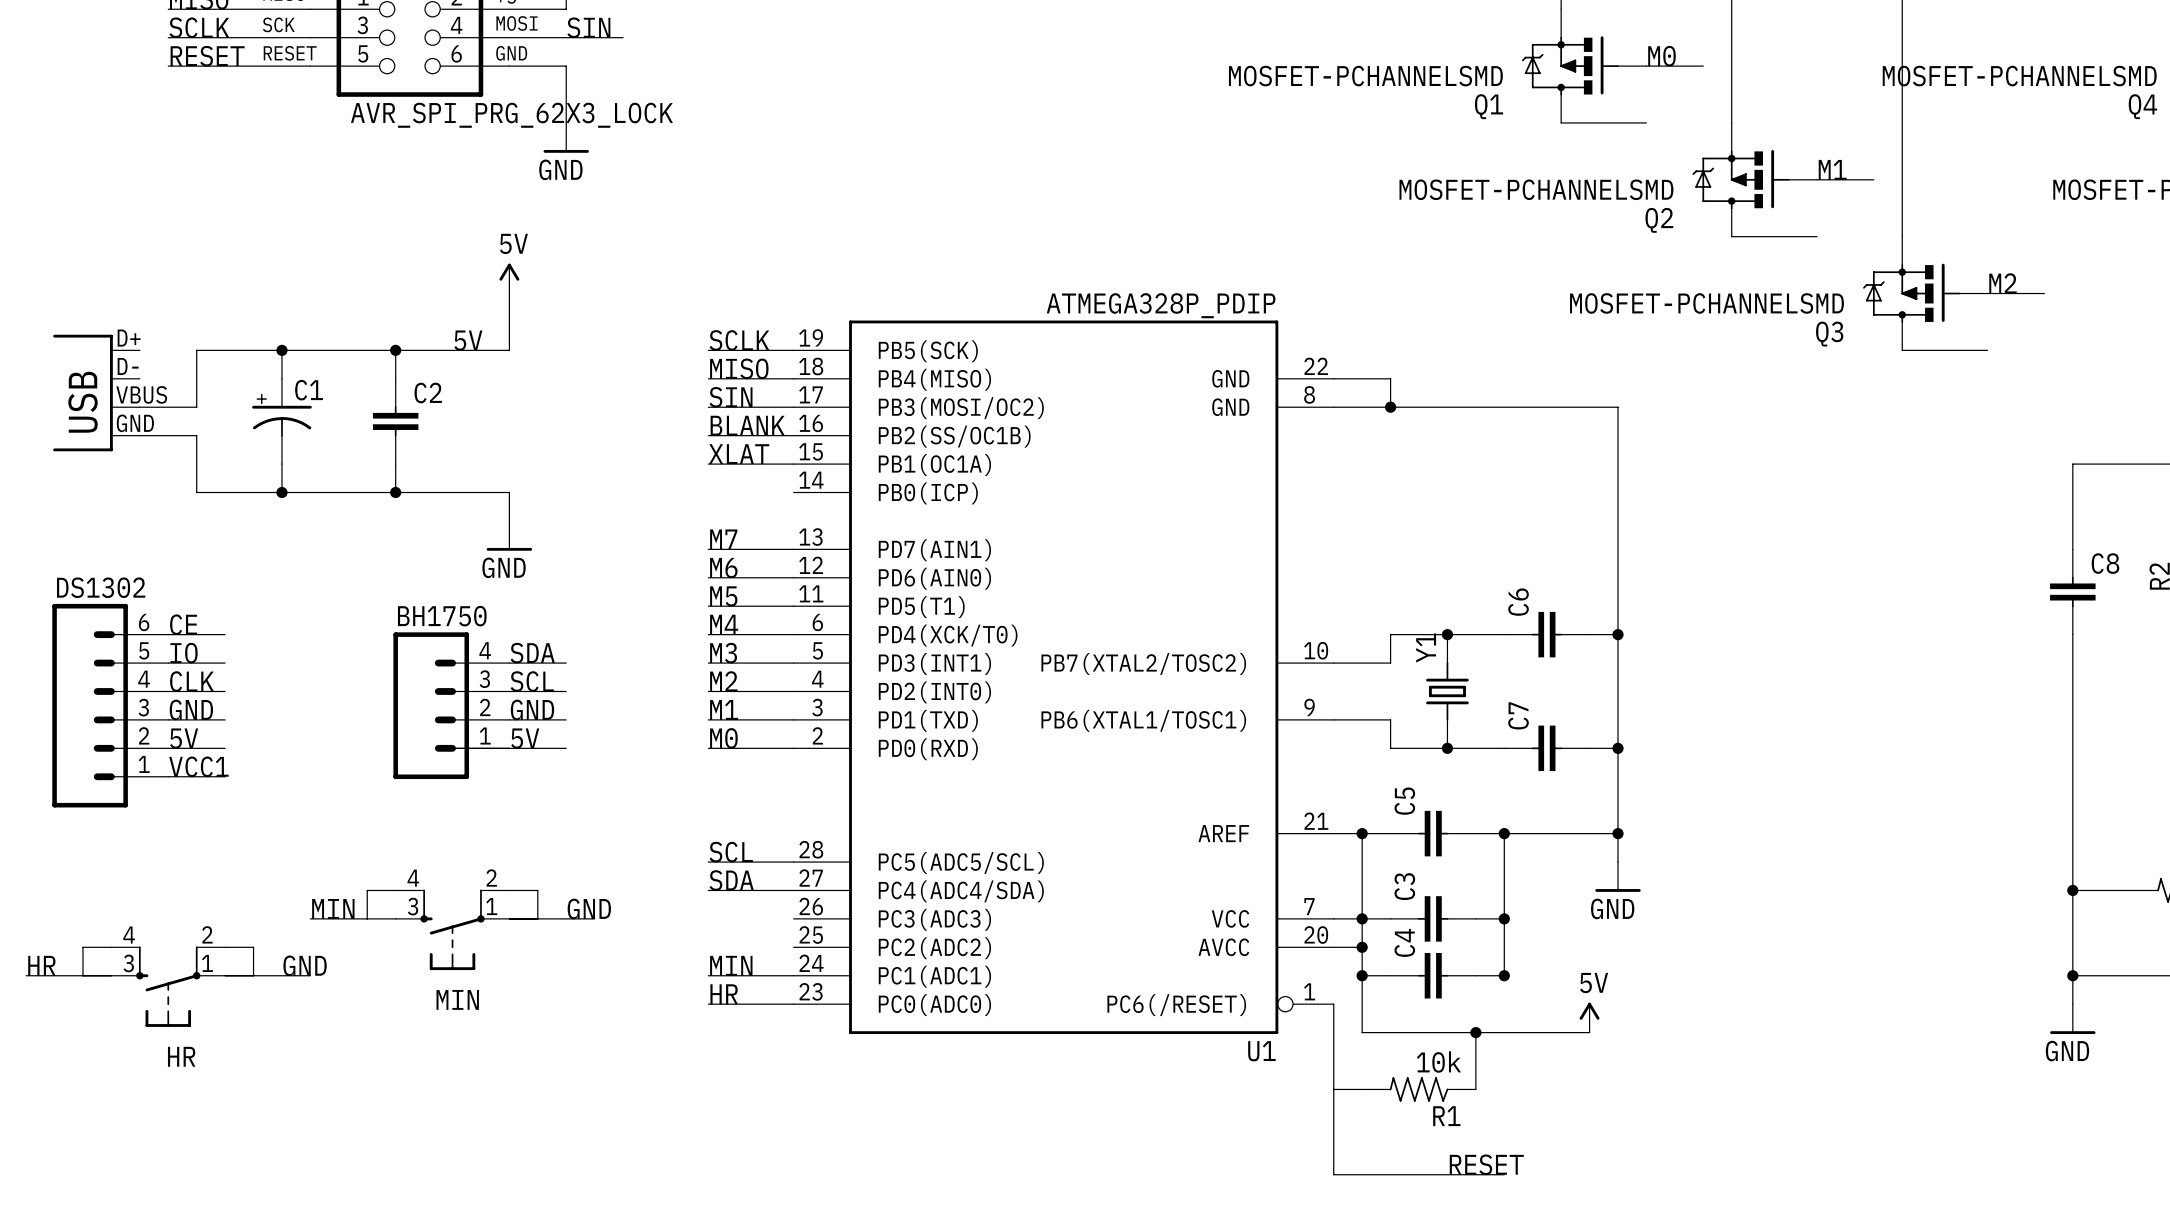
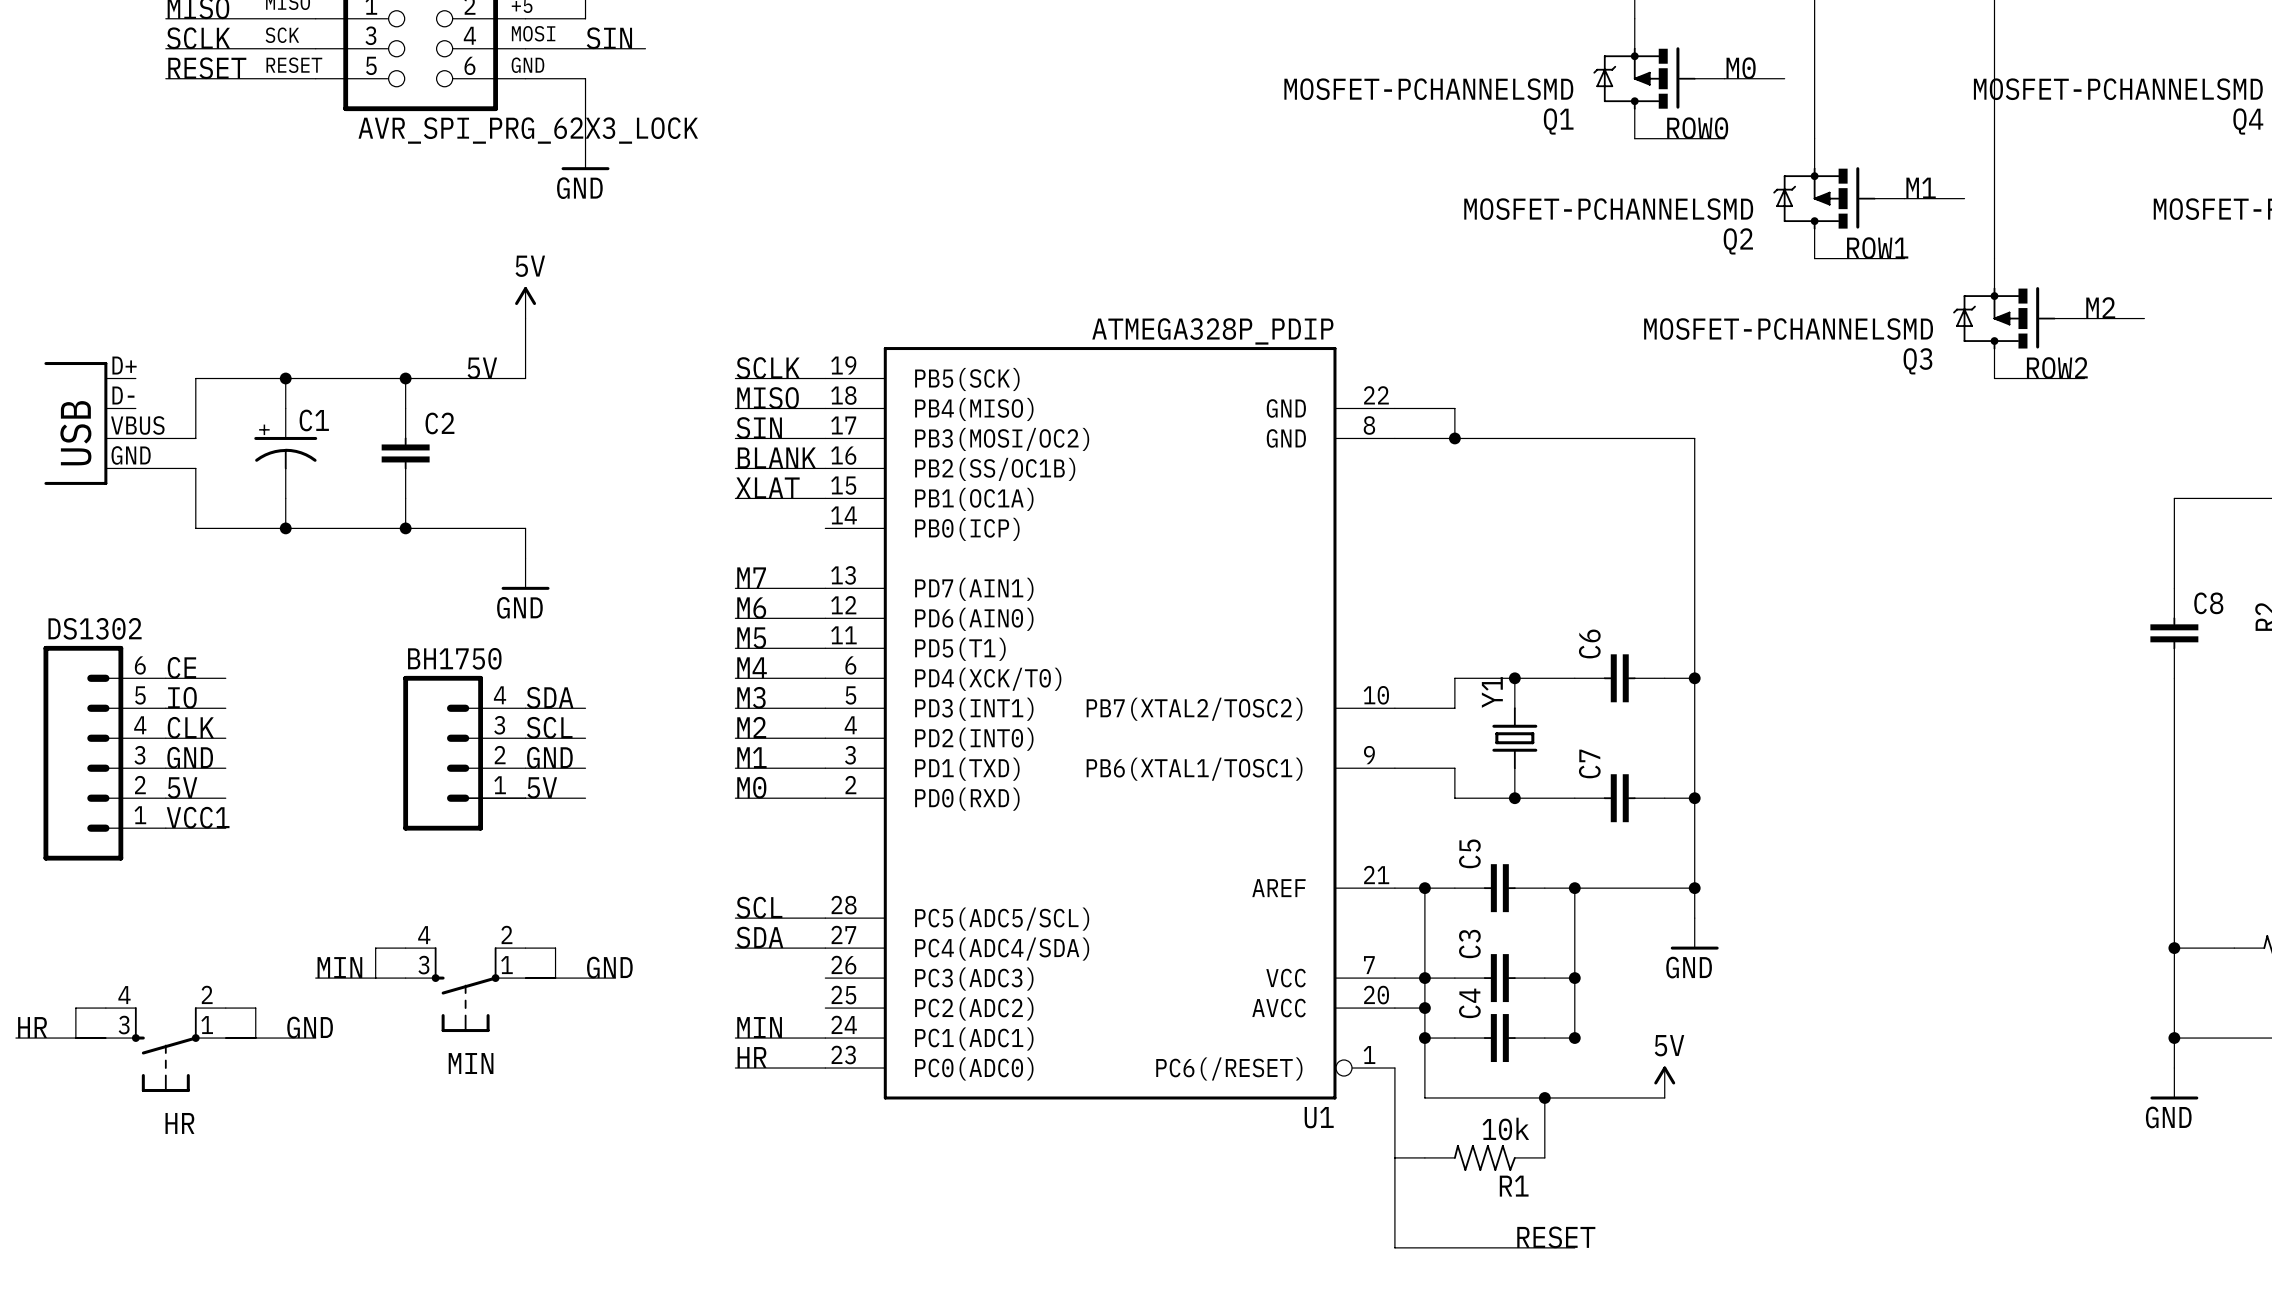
label: none -> ROW0 (1697, 128)
label: none -> ROW1 (1877, 248)
label: none -> ROW2 (2057, 368)

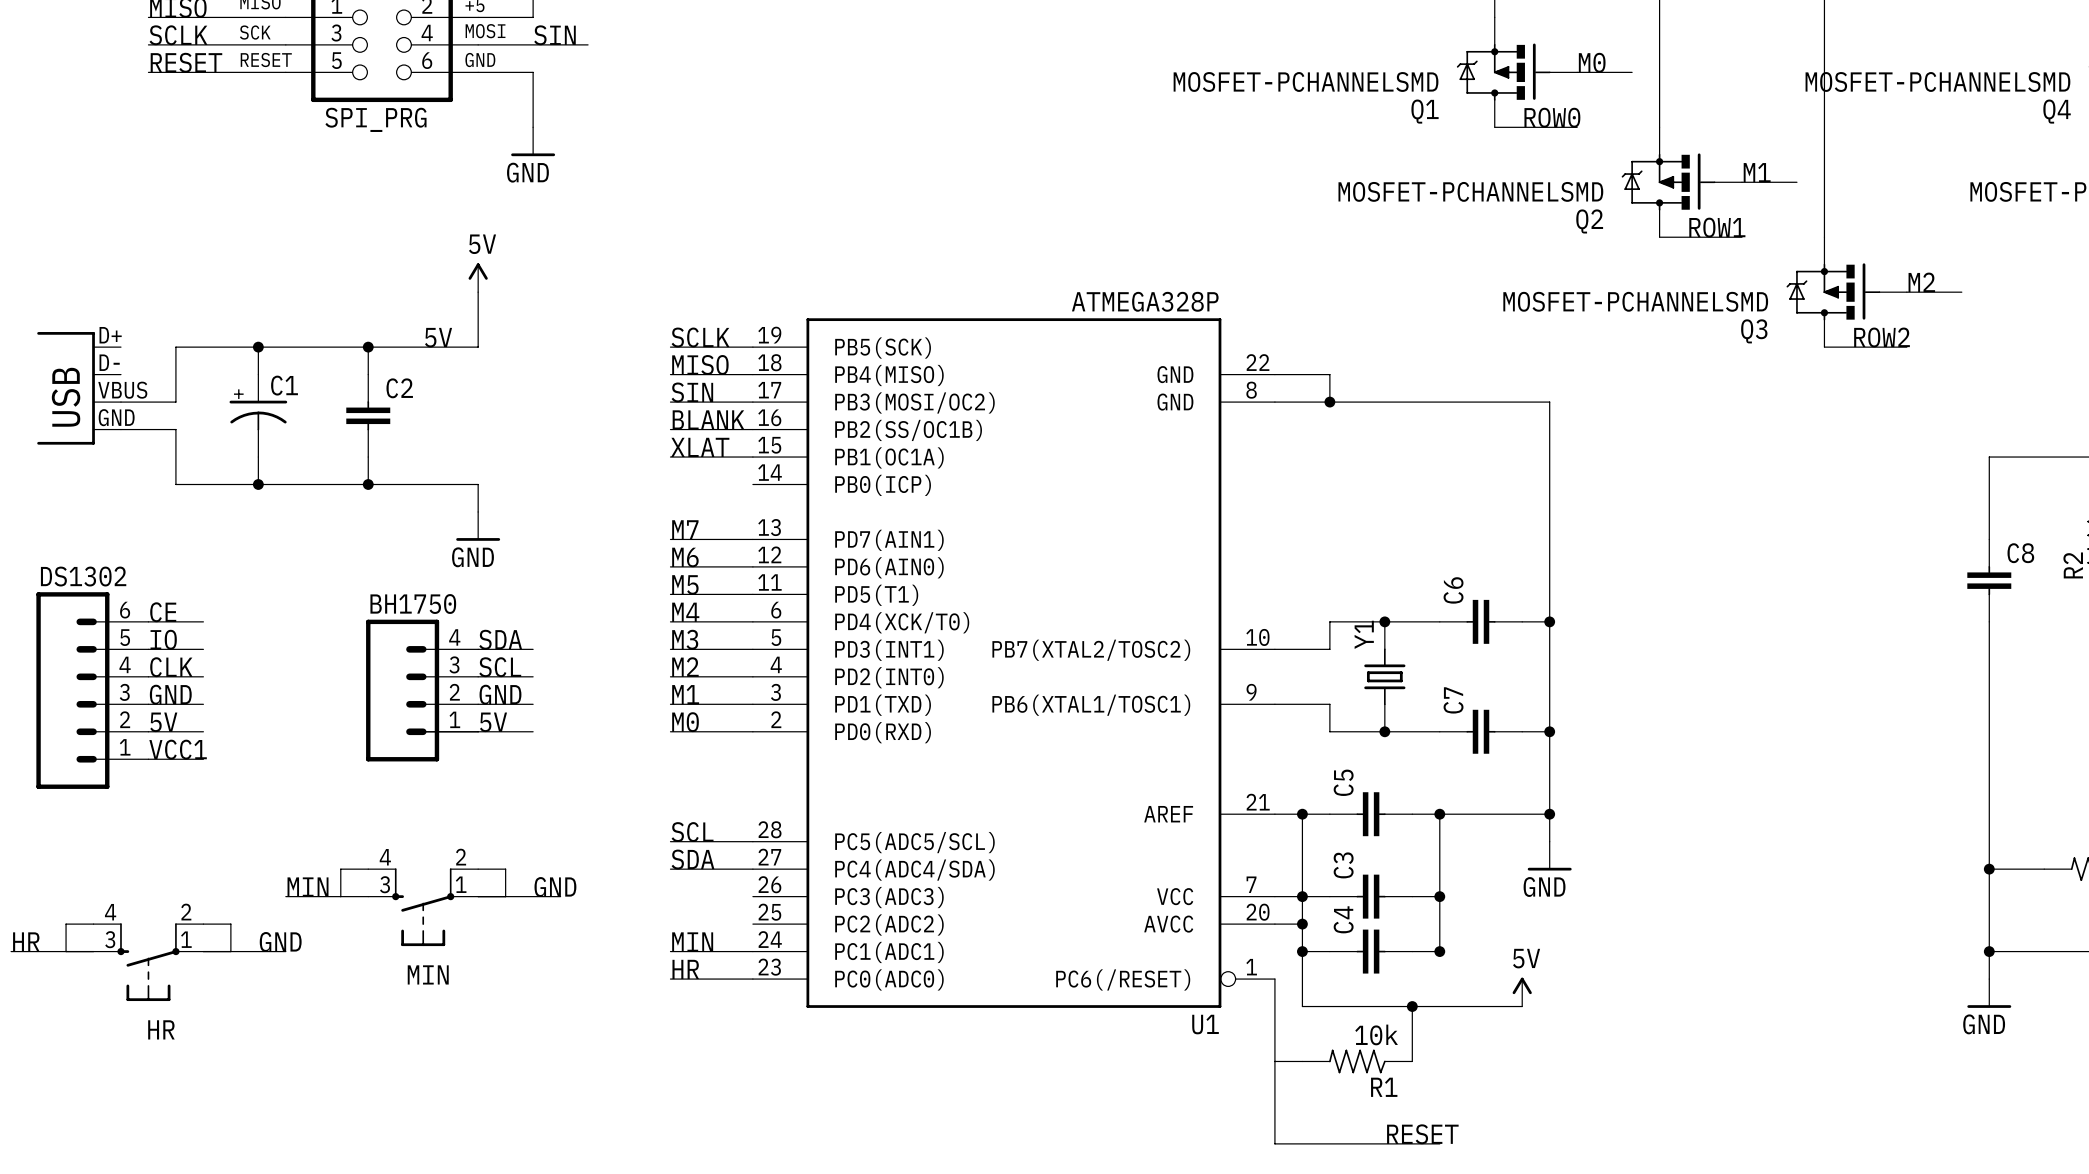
part value: AVR_SPI_PRG_62X3_LOCK (528, 130) -> SPI_PRG (375, 119)
U1 value: ATMEGA328P_PDIP (1212, 331) -> ATMEGA328P (1145, 301)

